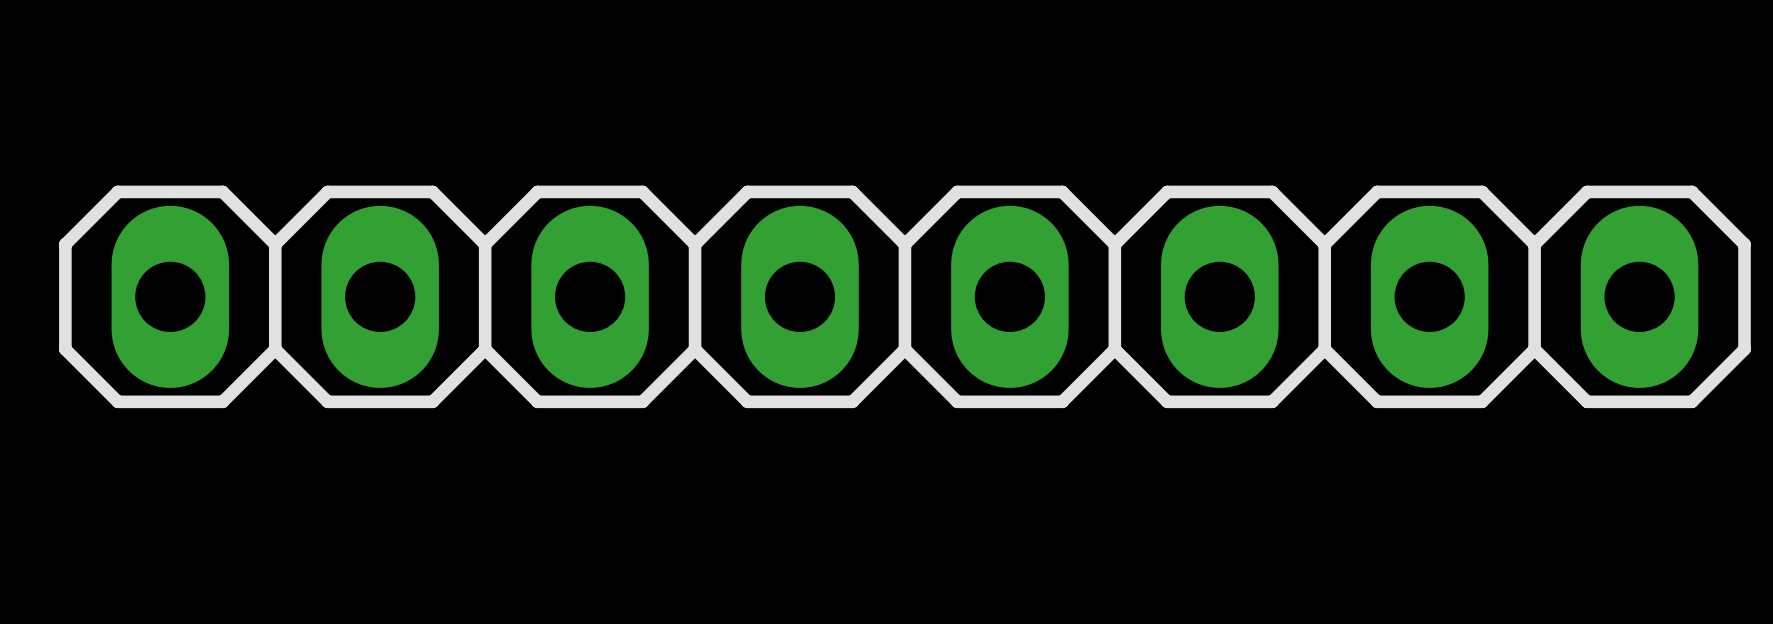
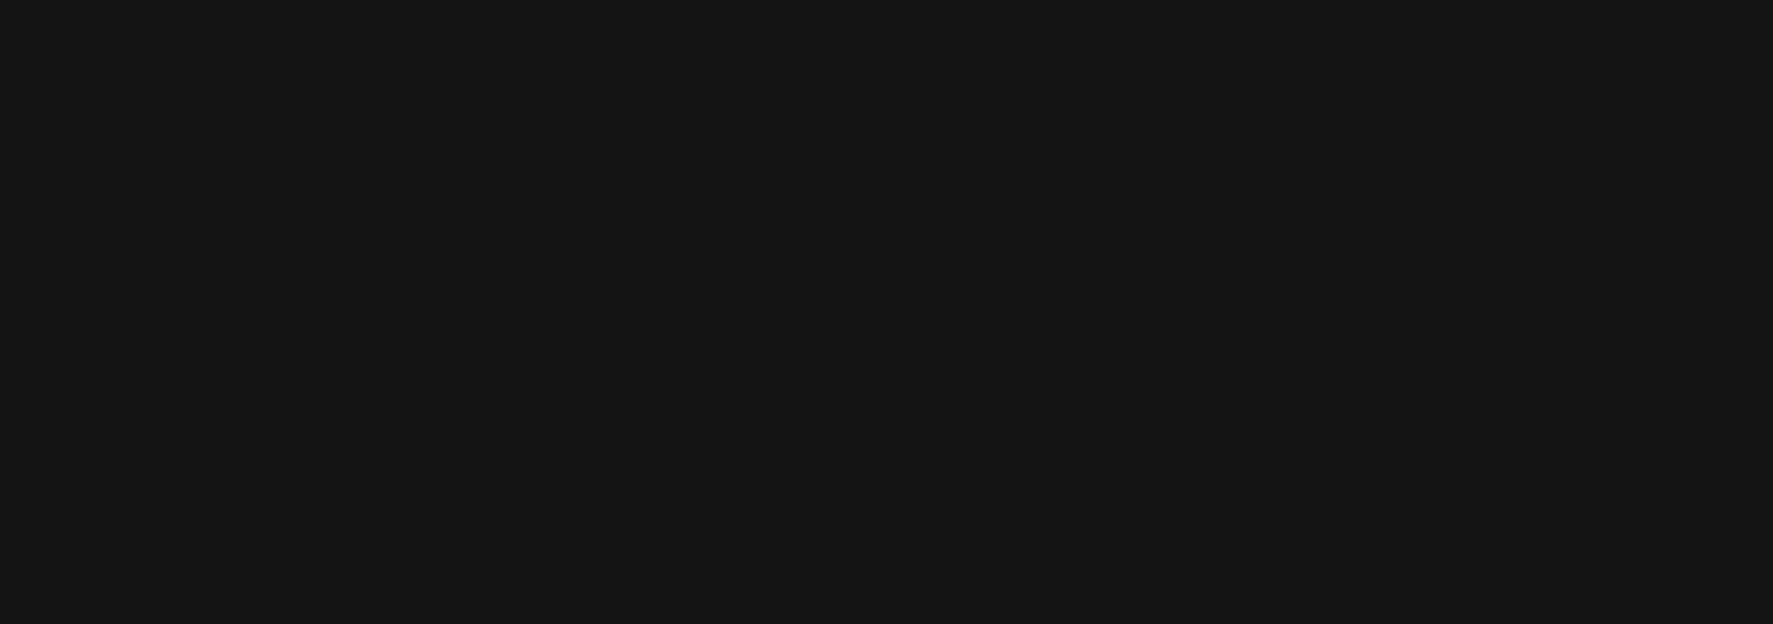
part: (904, 296) -> none

